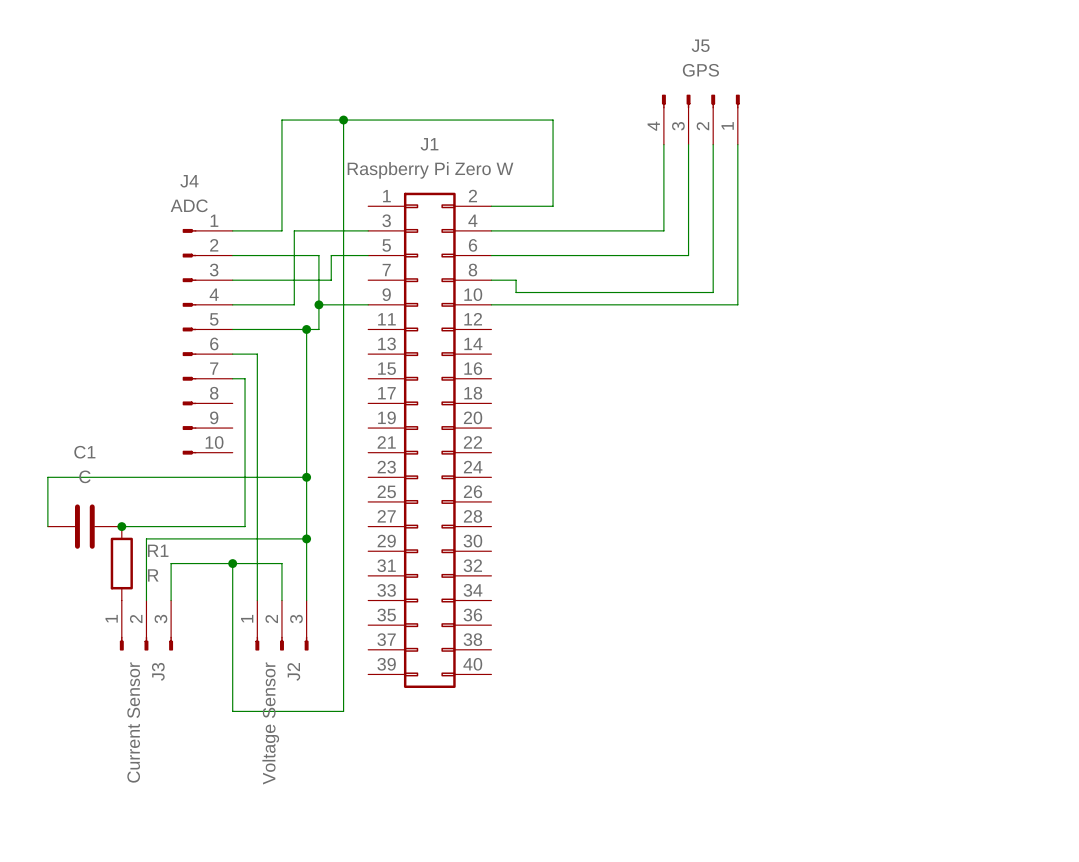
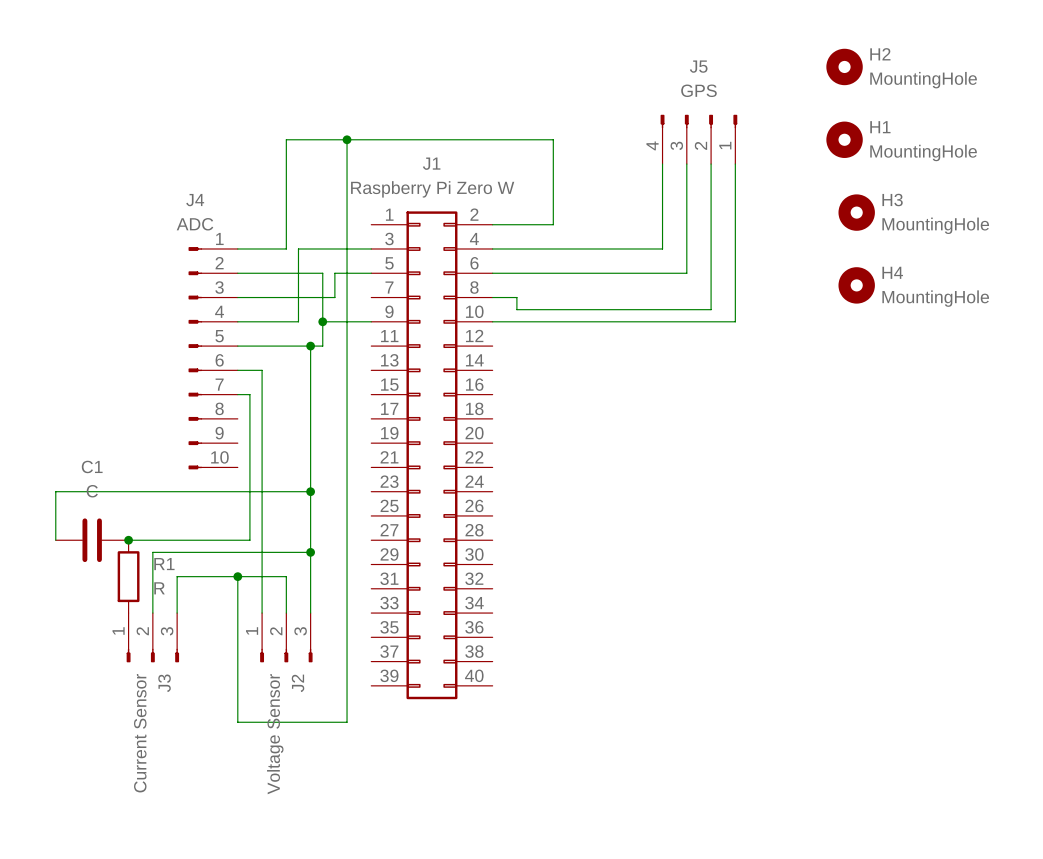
H2: none -> MountingHole (844, 66)
H1: none -> MountingHole (844, 139)
H3: none -> MountingHole (856, 212)
H4: none -> MountingHole (856, 285)

